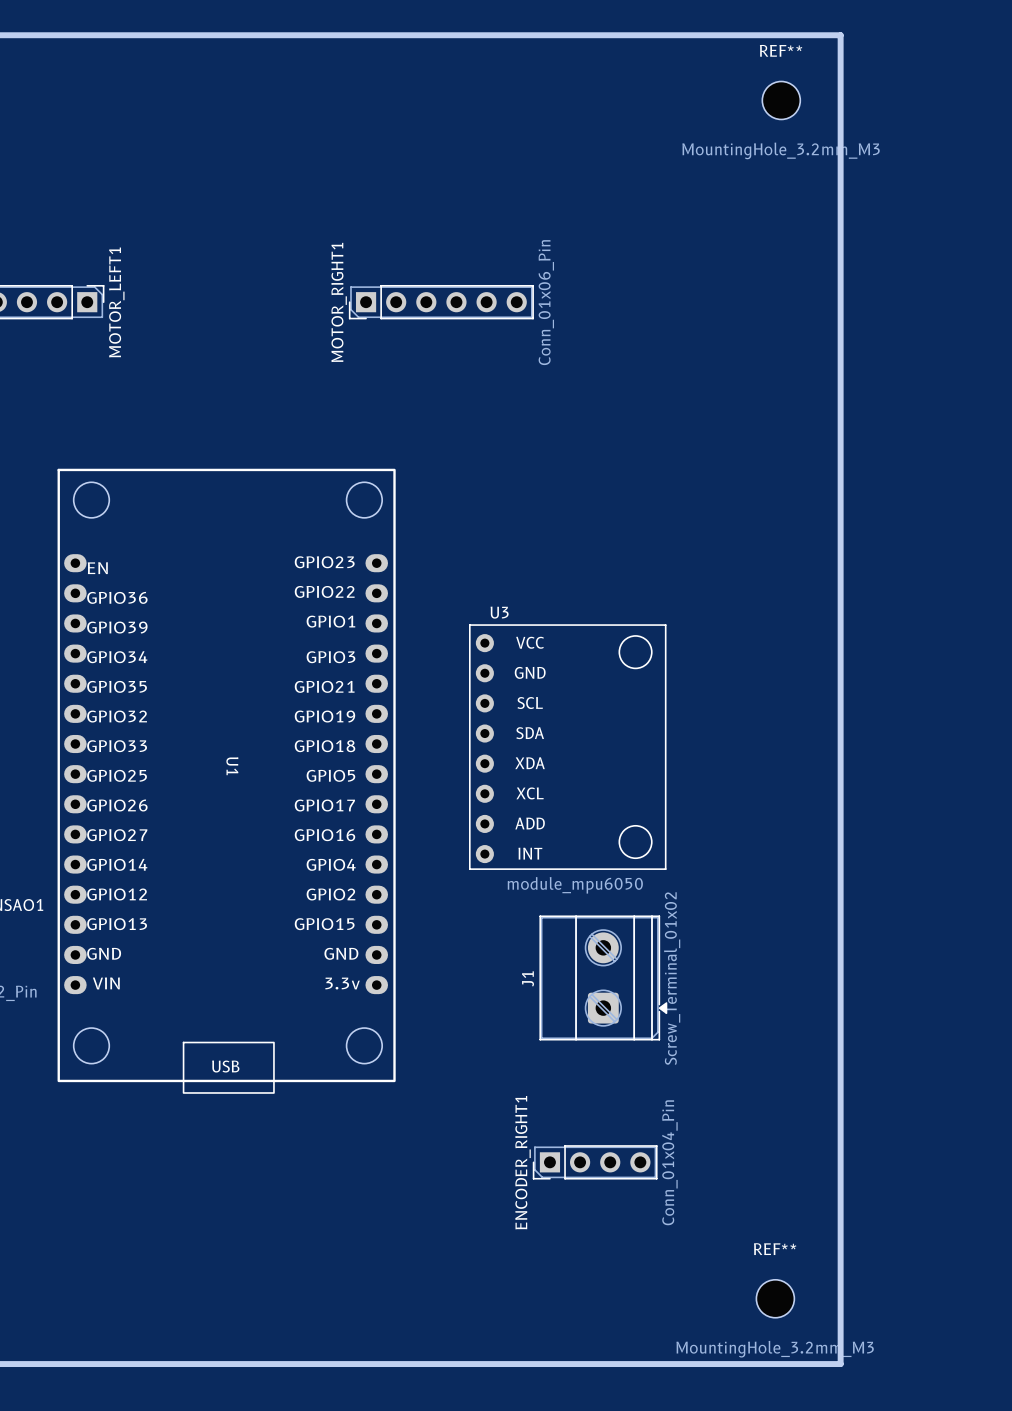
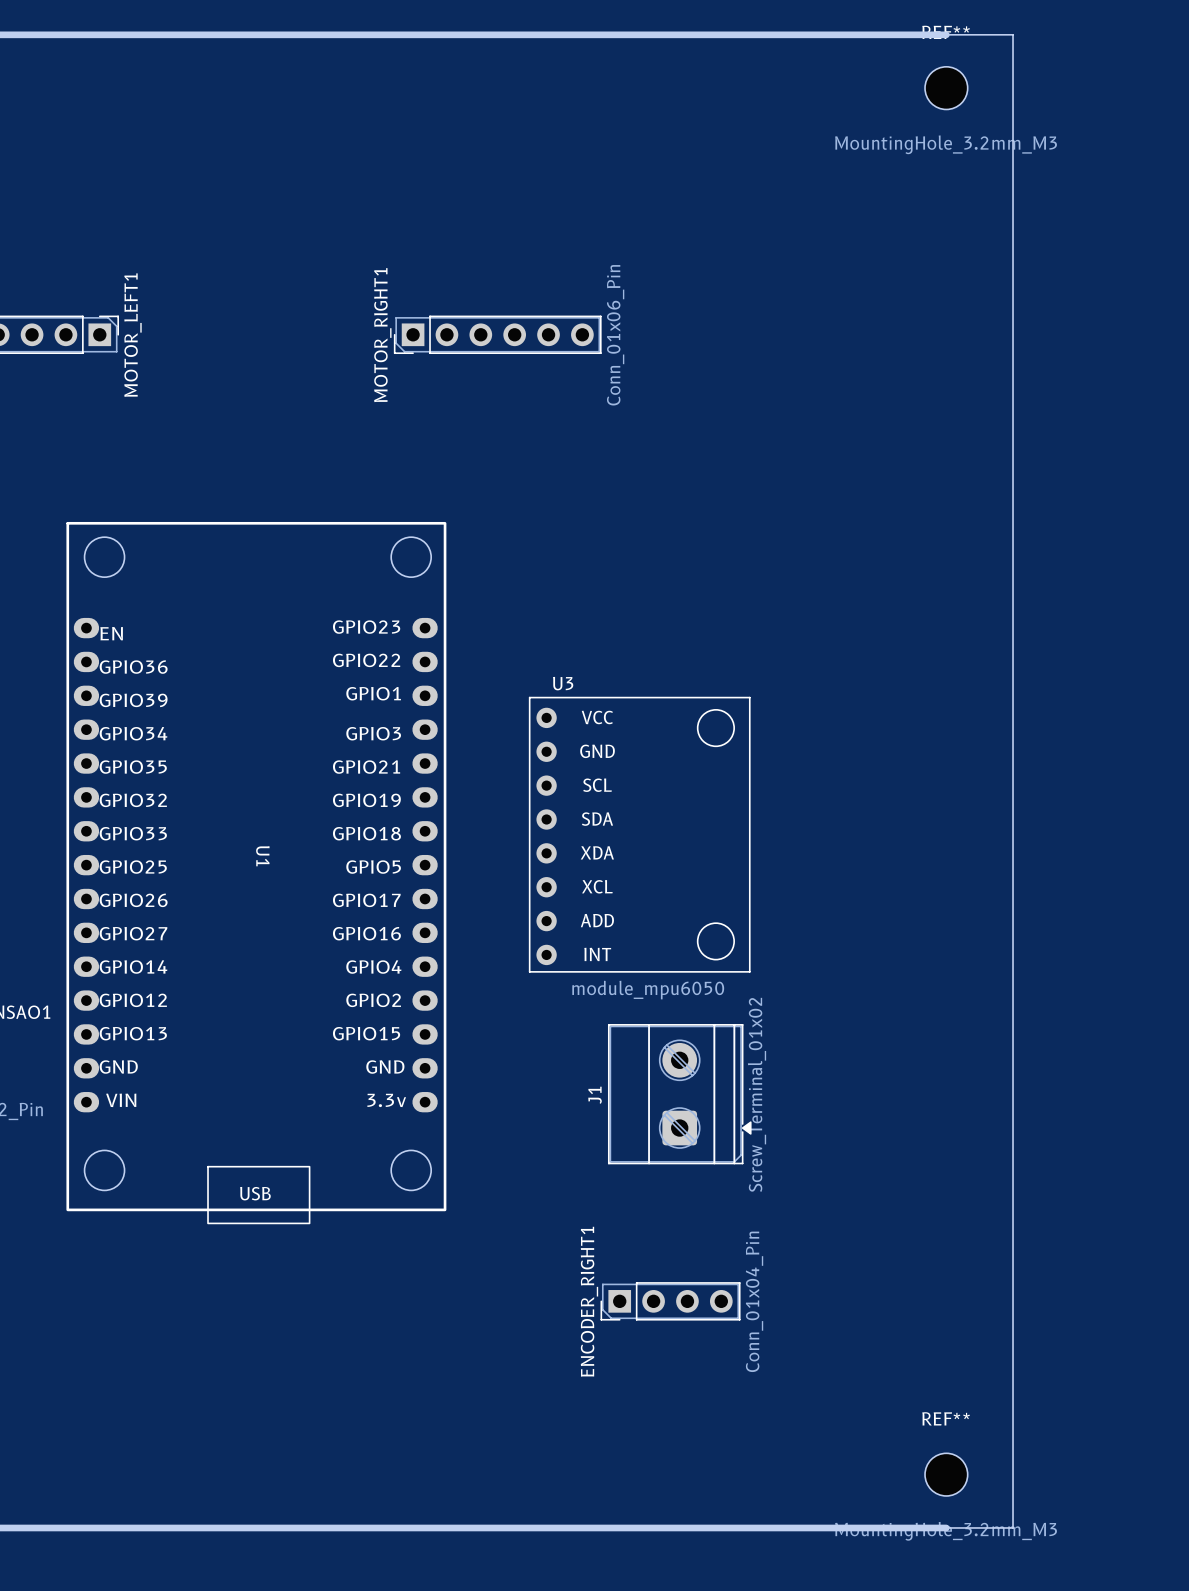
board edge: (840, 35) (840, 1364) -> (946, 34) (1013, 34) (1013, 1527) (946, 1527)
REF** position: (781, 100) -> (946, 88)
REF** position: (775, 1298) -> (946, 1474)

